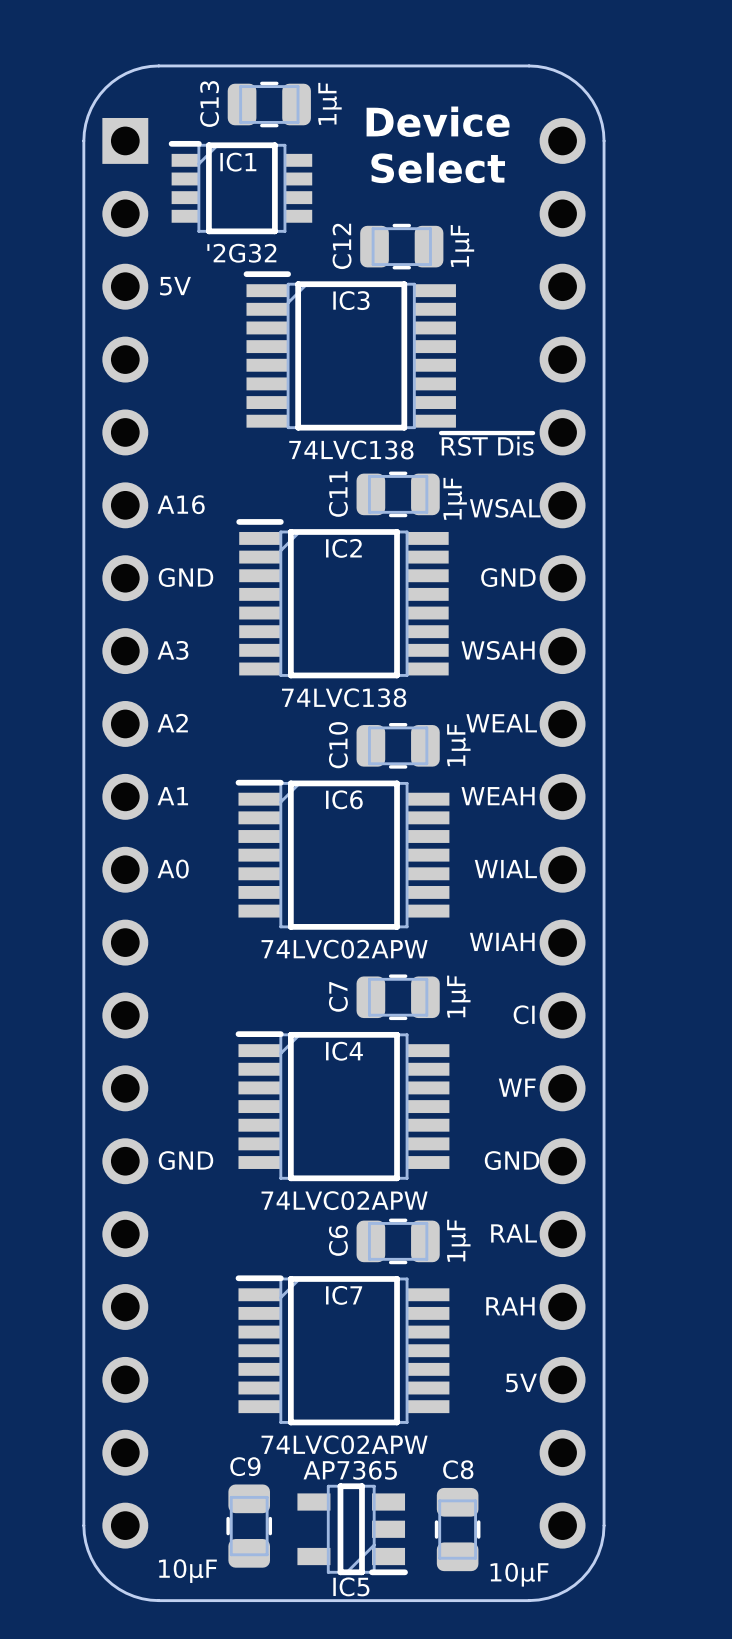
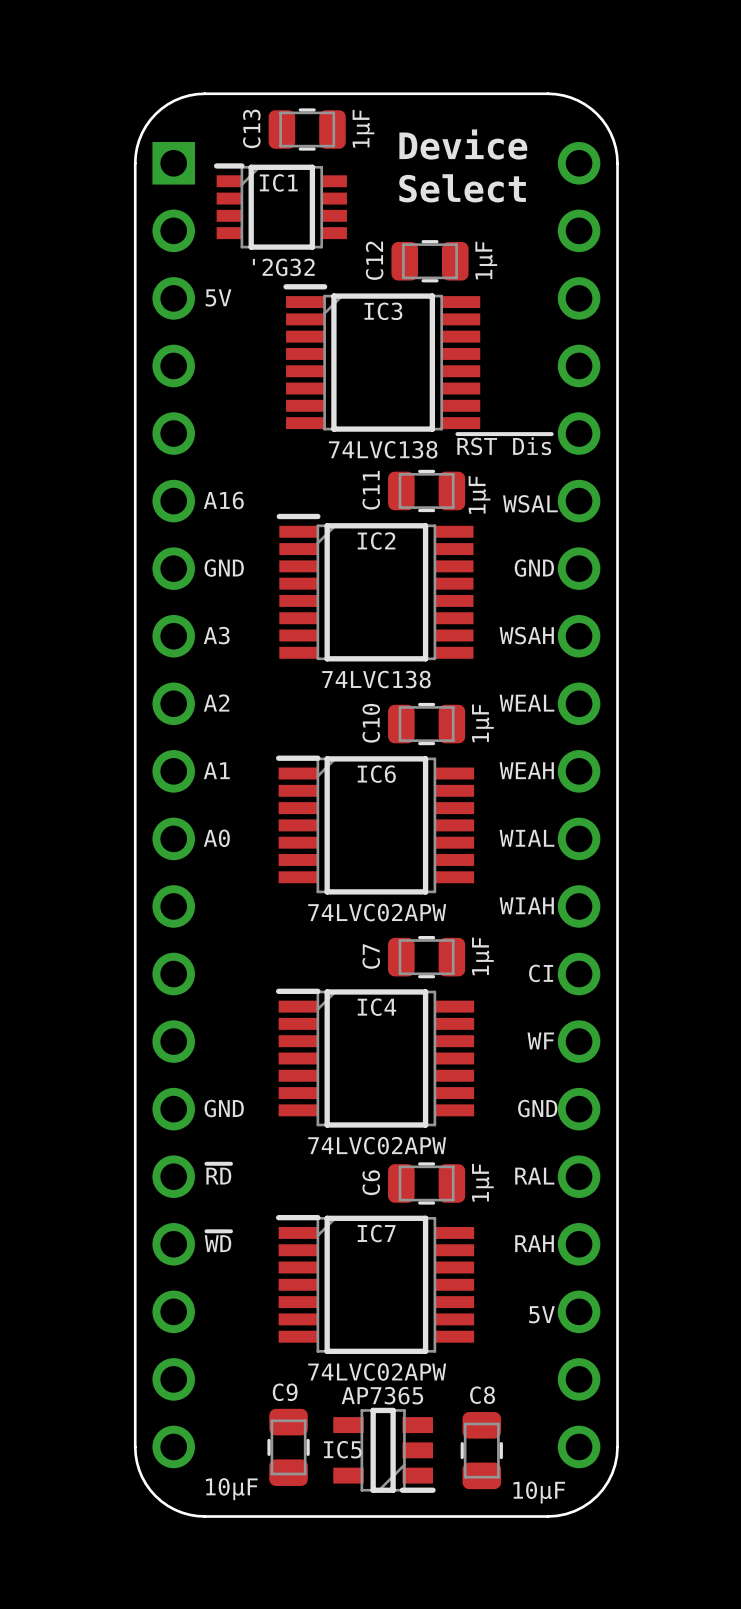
text: none -> ~{RD} (218, 1174)
text: none -> ~{WD} (218, 1241)
IC5 name position: IC5 (351, 1586) -> IC5 (342, 1449)

